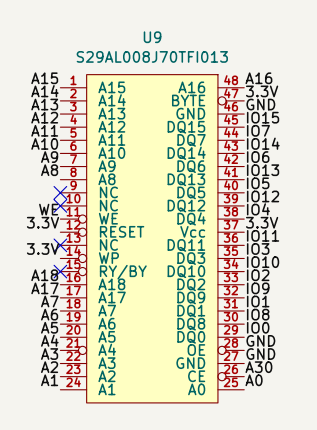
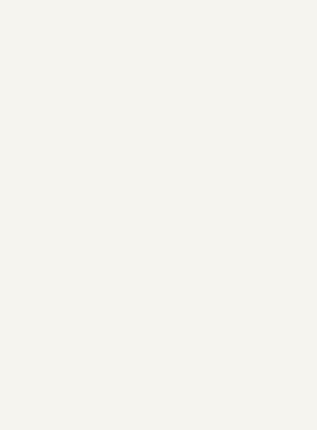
label: A15 (44, 78) -> none
label: A16 (258, 78) -> none
label: A14 (44, 91) -> none
label: 3.3V (262, 91) -> none
label: A13 (44, 104) -> none
label: GND (260, 104) -> none
label: A12 (44, 117) -> none
label: IO15 (263, 117) -> none
label: A11 (44, 130) -> none
label: IO7 (258, 130) -> none
label: A10 (44, 143) -> none
label: IO14 (263, 143) -> none
label: A9 (49, 157) -> none
label: IO6 (258, 157) -> none
label: A8 (49, 170) -> none
label: IO13 (263, 170) -> none
label: IO5 (258, 183) -> none
no-connect mark: (60, 192) -> none
label: IO12 (263, 196) -> none
no-connect mark: (60, 205) -> none
label: WE (48, 209) -> none
label: IO4 (258, 209) -> none
label: 3.3V (43, 222) -> none
label: 3.3V (262, 222) -> none
label: IO11 (263, 235) -> none
U9: S29AL008J70TFI013 (152, 238) -> none
no-connect mark: (60, 245) -> none
label: 3.3V (43, 248) -> none
label: IO3 (258, 248) -> none
label: IO10 (263, 262) -> none
no-connect mark: (60, 271) -> none
label: A18 (44, 275) -> none
label: IO2 (258, 275) -> none
label: A17 (44, 288) -> none
label: IO9 (258, 288) -> none
label: A7 (49, 301) -> none
label: IO1 (258, 301) -> none
label: A6 (49, 314) -> none
label: IO8 (258, 314) -> none
label: A5 (49, 327) -> none
label: IO0 (258, 327) -> none
label: A4 (49, 340) -> none
label: GND (260, 340) -> none
label: A3 (49, 354) -> none
label: GND (260, 354) -> none
label: A2 (49, 367) -> none
label: A30 (258, 367) -> none
label: A1 (49, 380) -> none
label: A0 (254, 380) -> none

